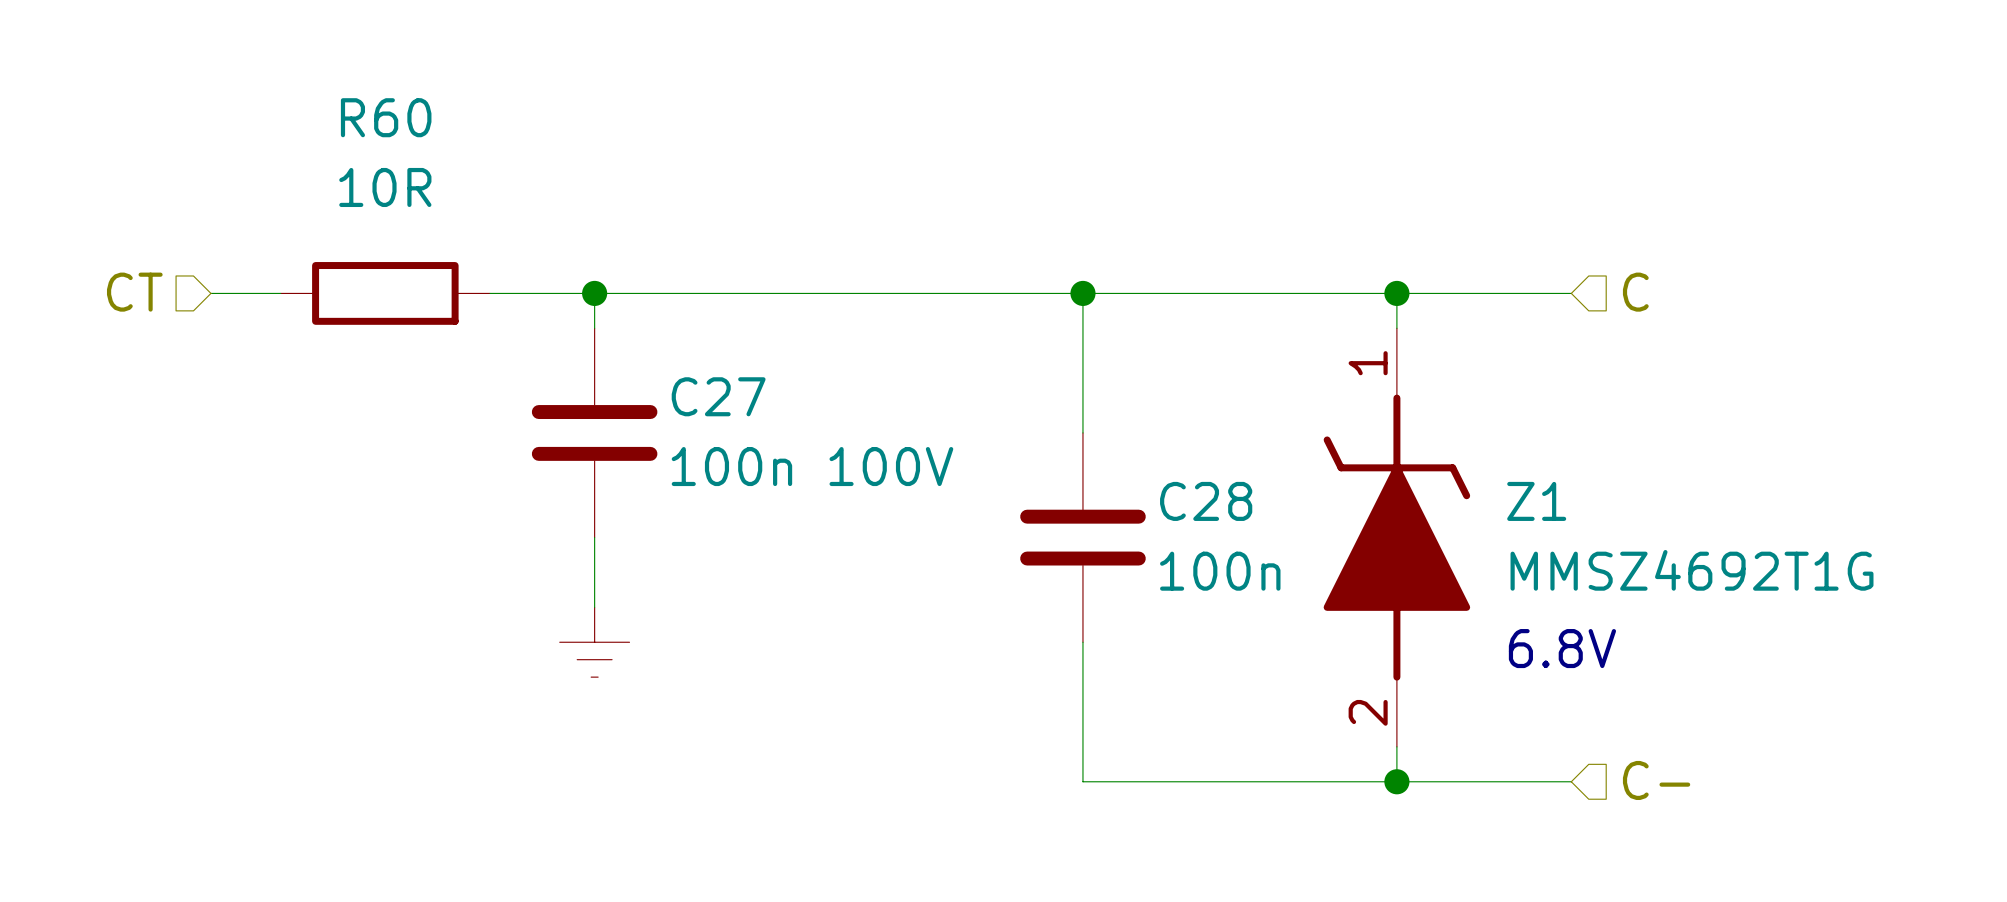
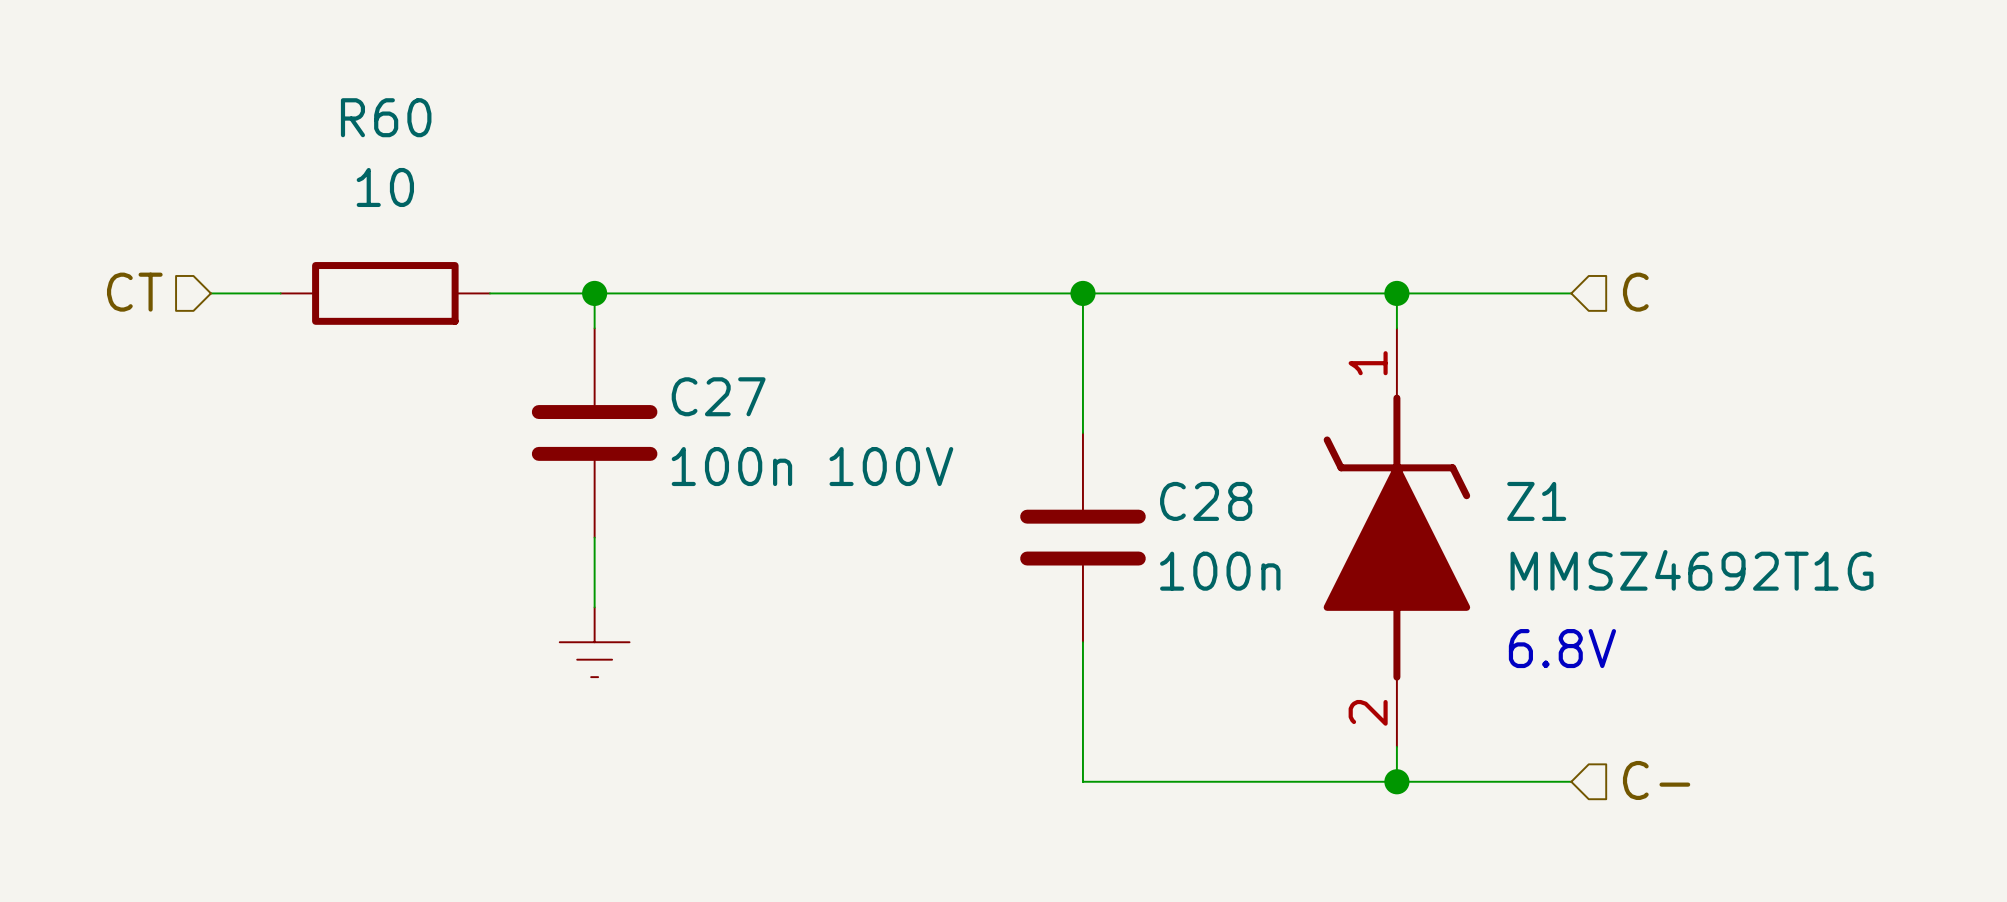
R60 value: 10R (385, 187) -> 10 (385, 187)

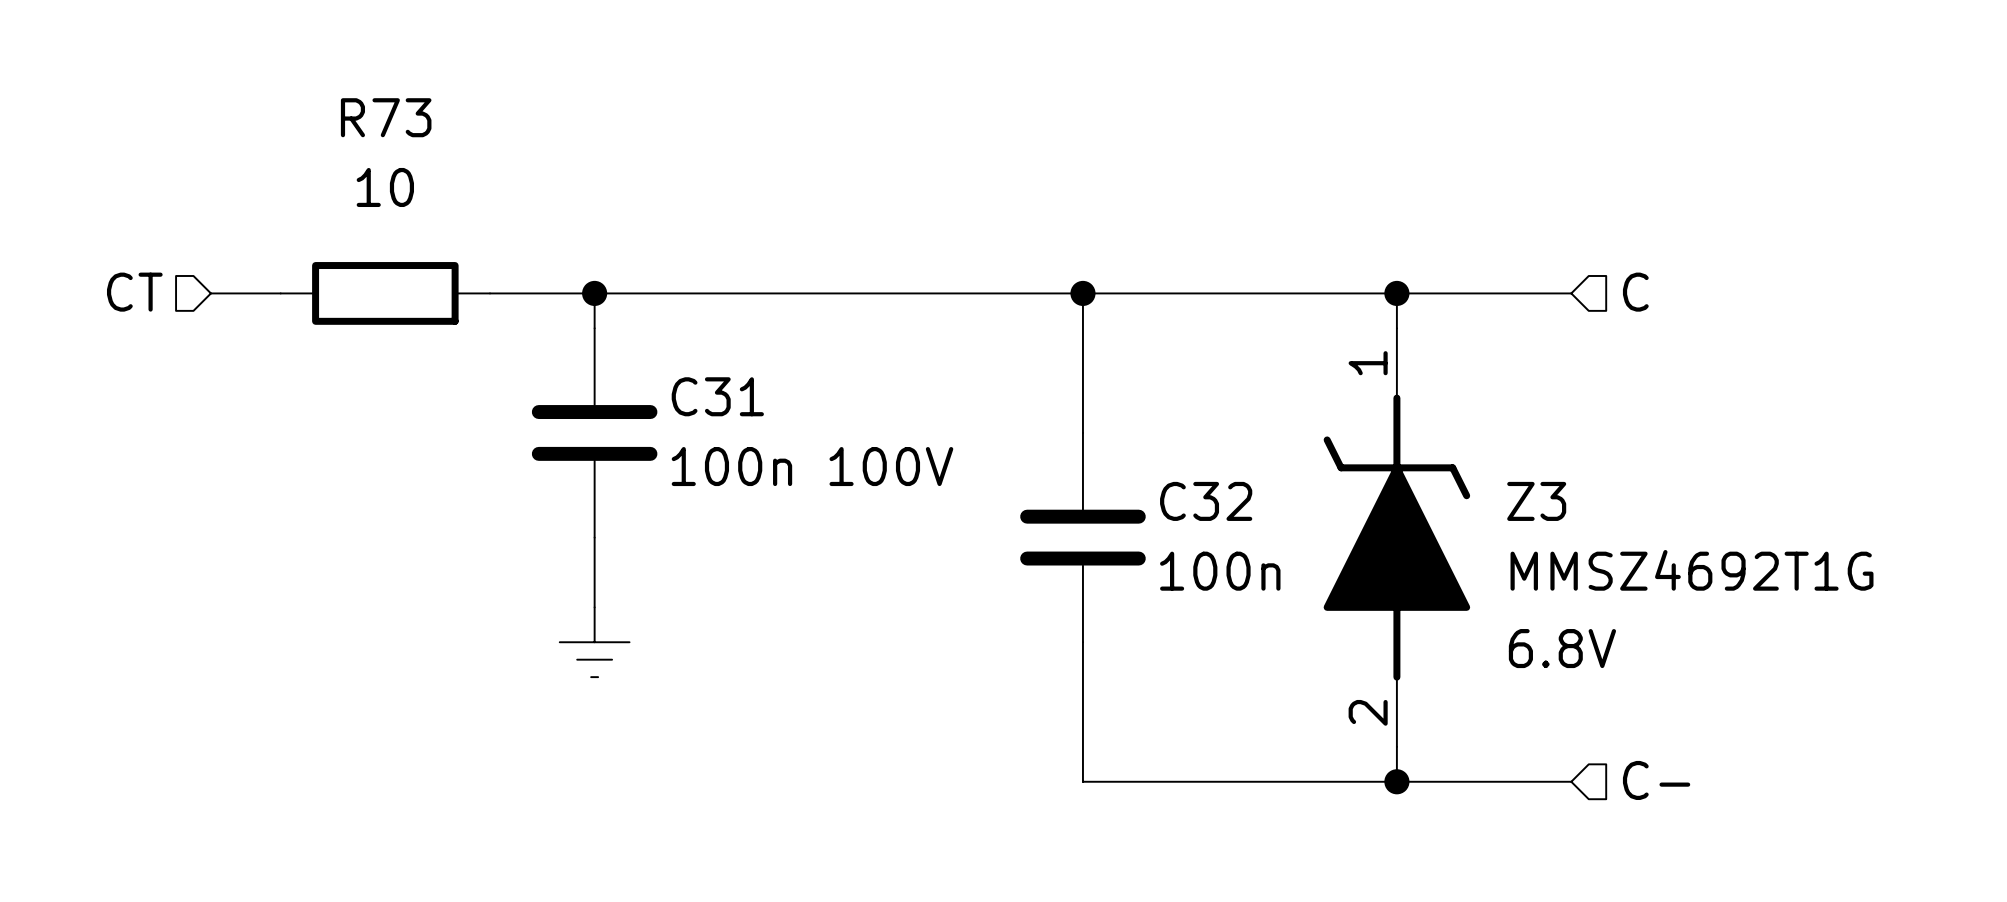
R60 name: R60 (386, 117) -> R73 (386, 117)
C27 name: C27 (718, 396) -> C31 (717, 396)
C28 name: C28 (1206, 501) -> C32 (1206, 501)
Z1 name: Z1 (1536, 501) -> Z3 (1536, 501)

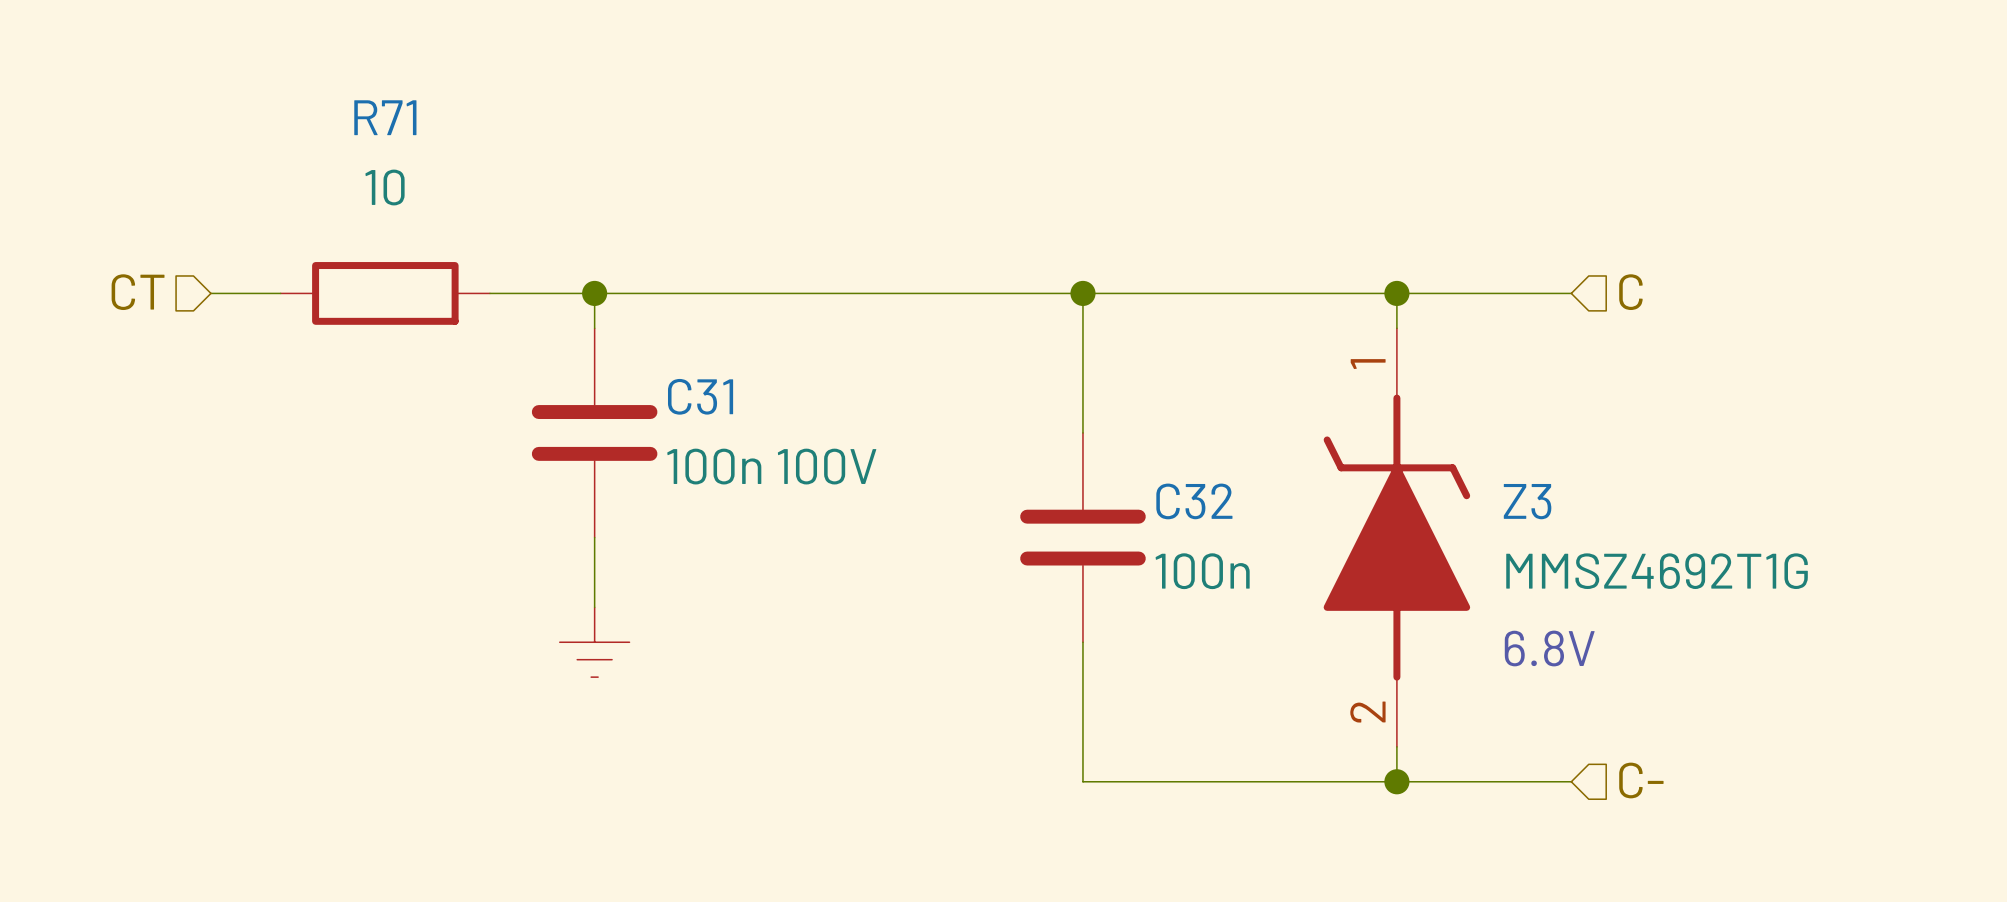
R73 name: R73 (386, 117) -> R71 (385, 117)

